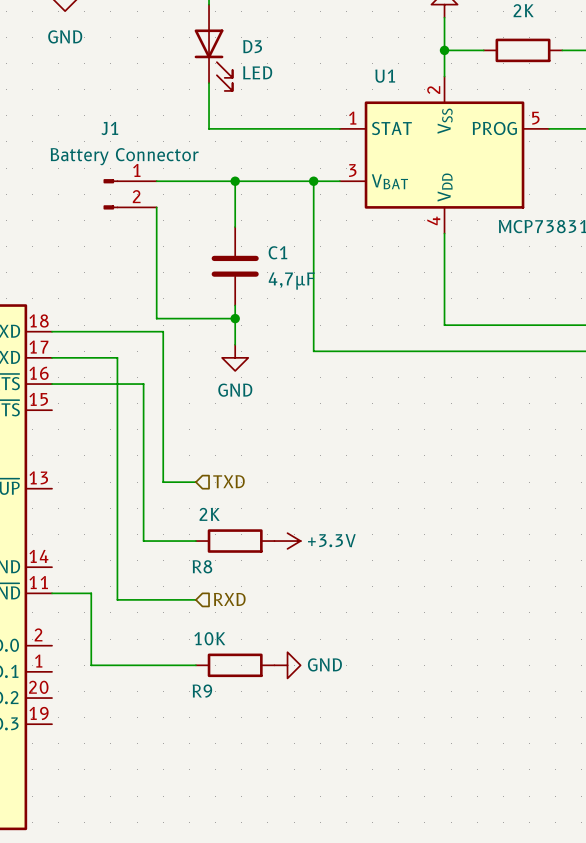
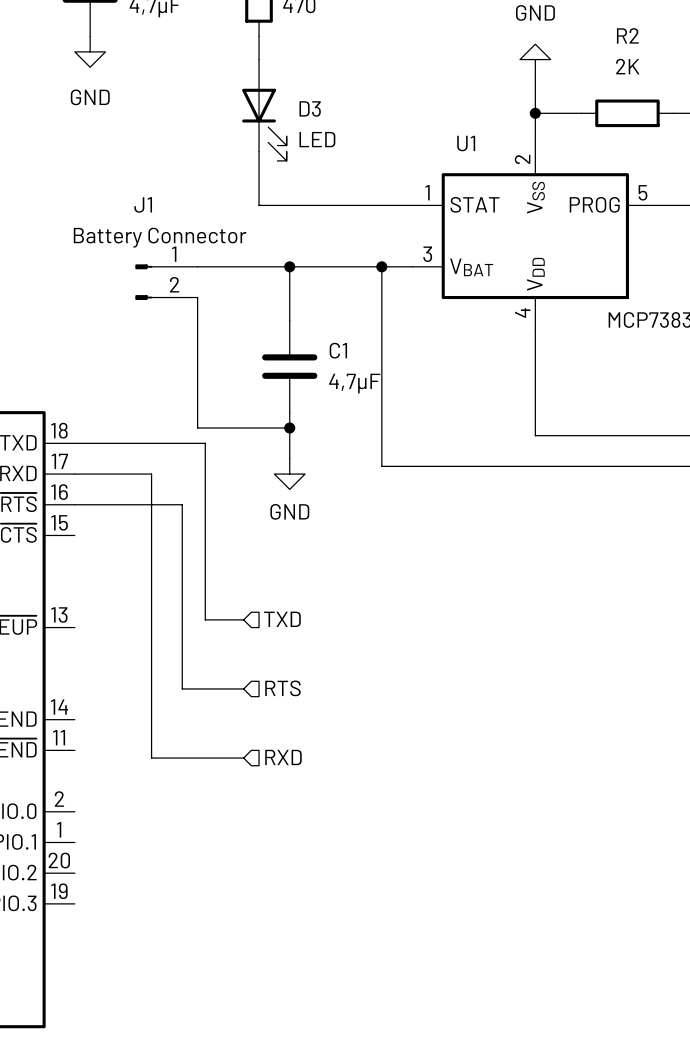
hierarchical label: none -> RTS (282, 688)
R8: 2K (235, 541) -> none
power symbol: +3.3V (287, 541) -> none
wire: (52, 593) (91, 593) (91, 665) (195, 665) -> none
R9: 10K (235, 665) -> none
power symbol: GND (287, 665) -> none

